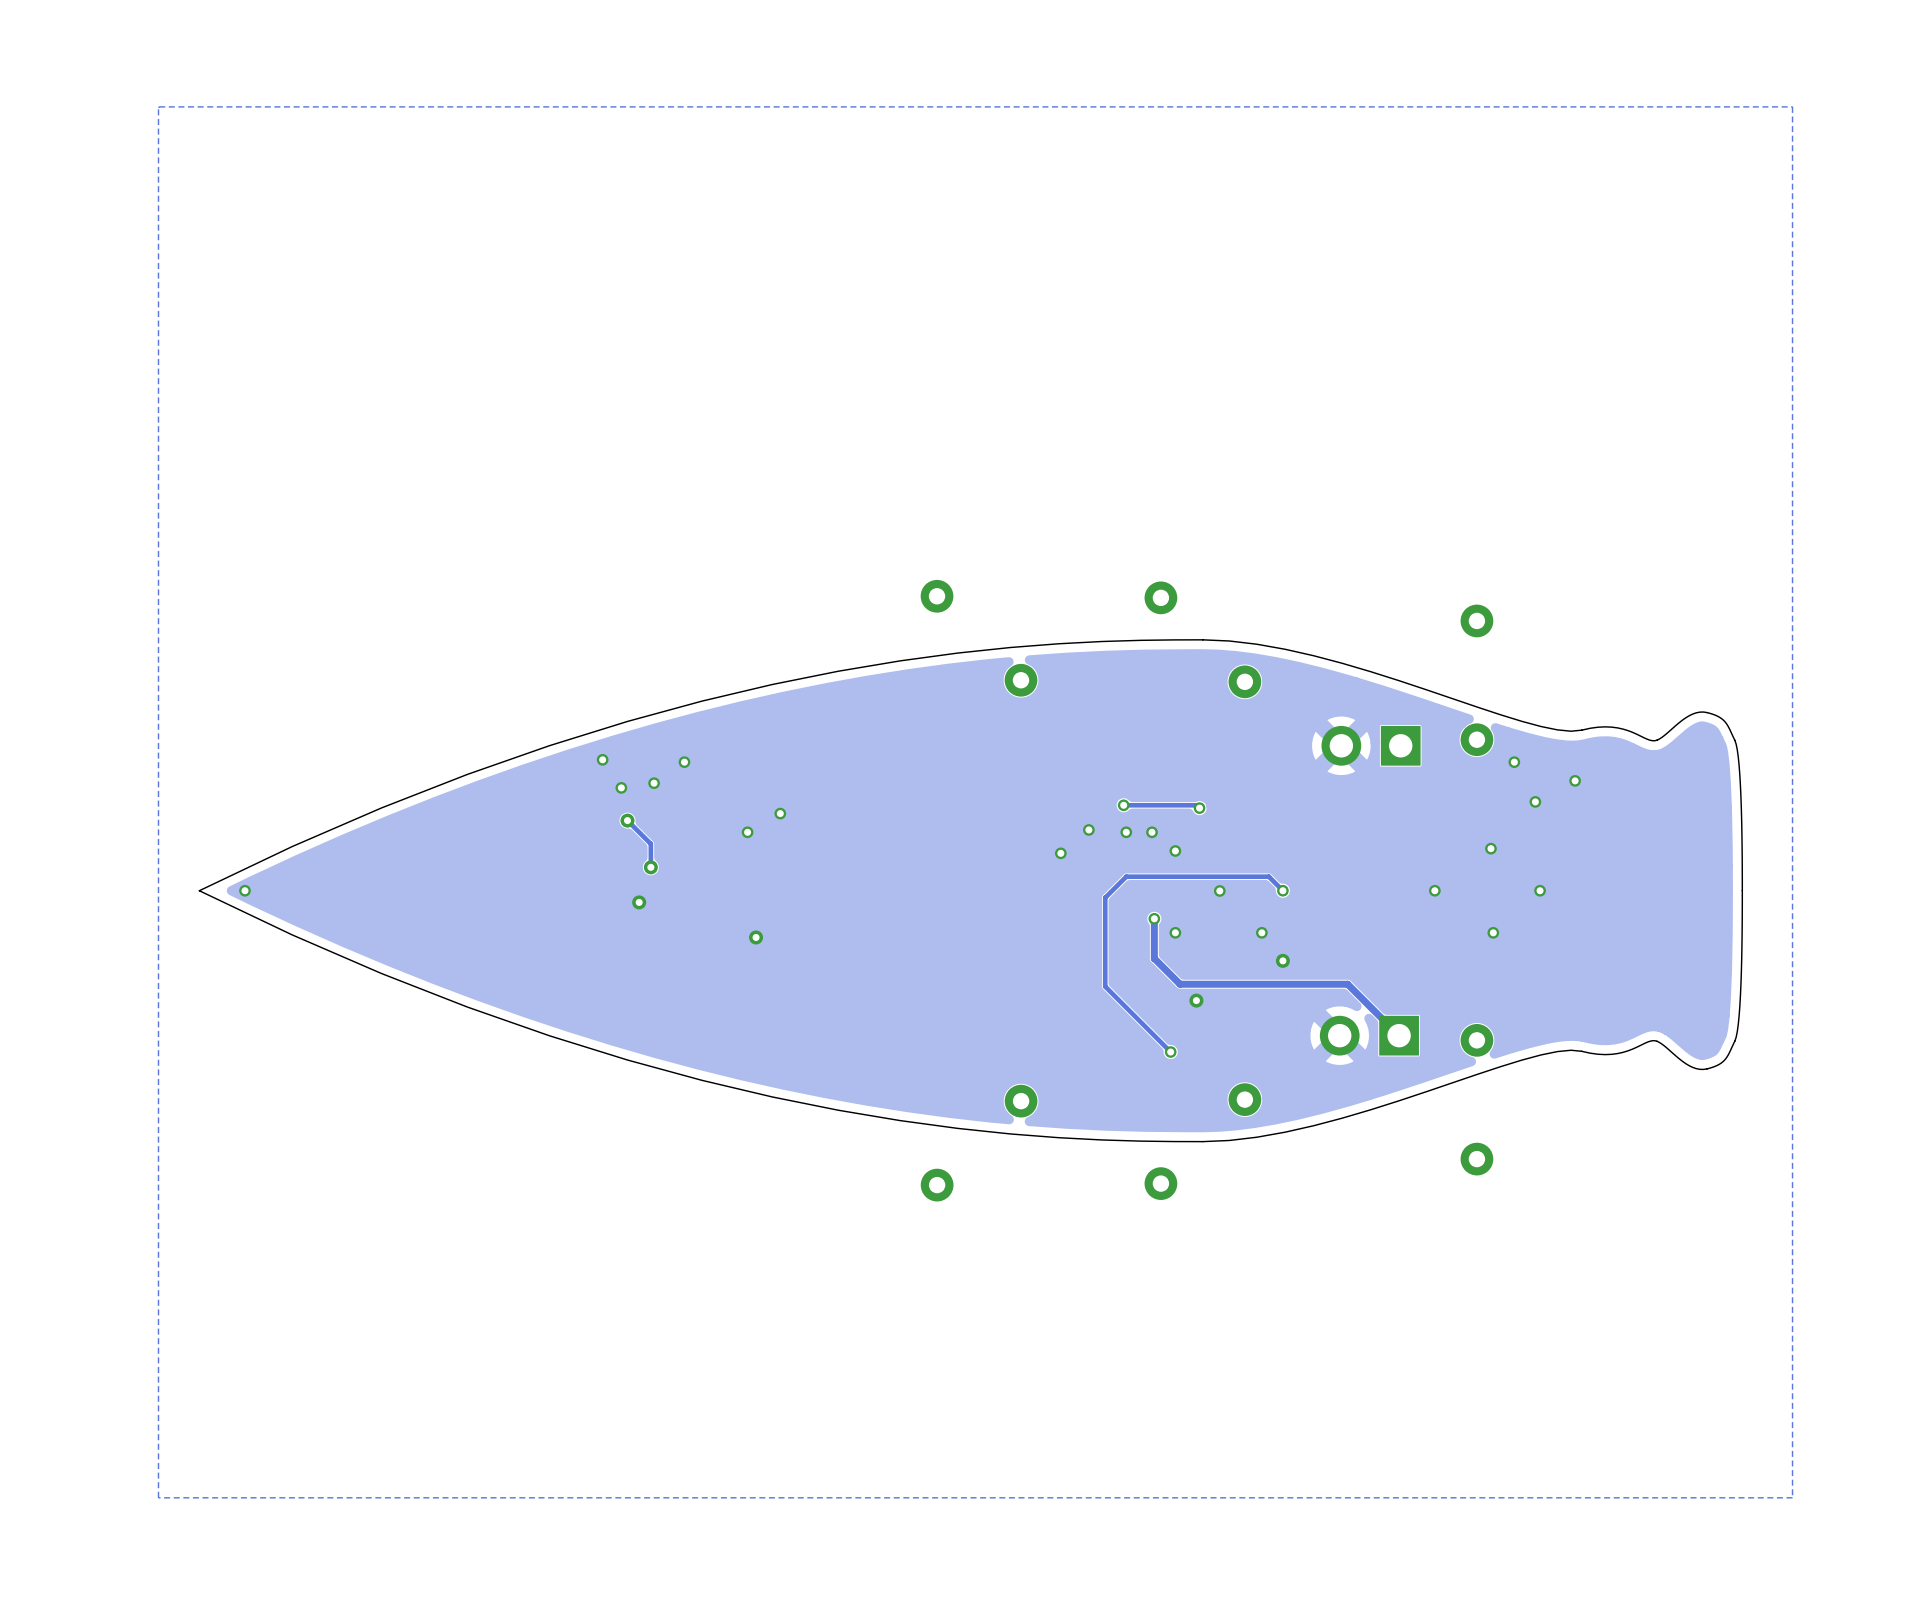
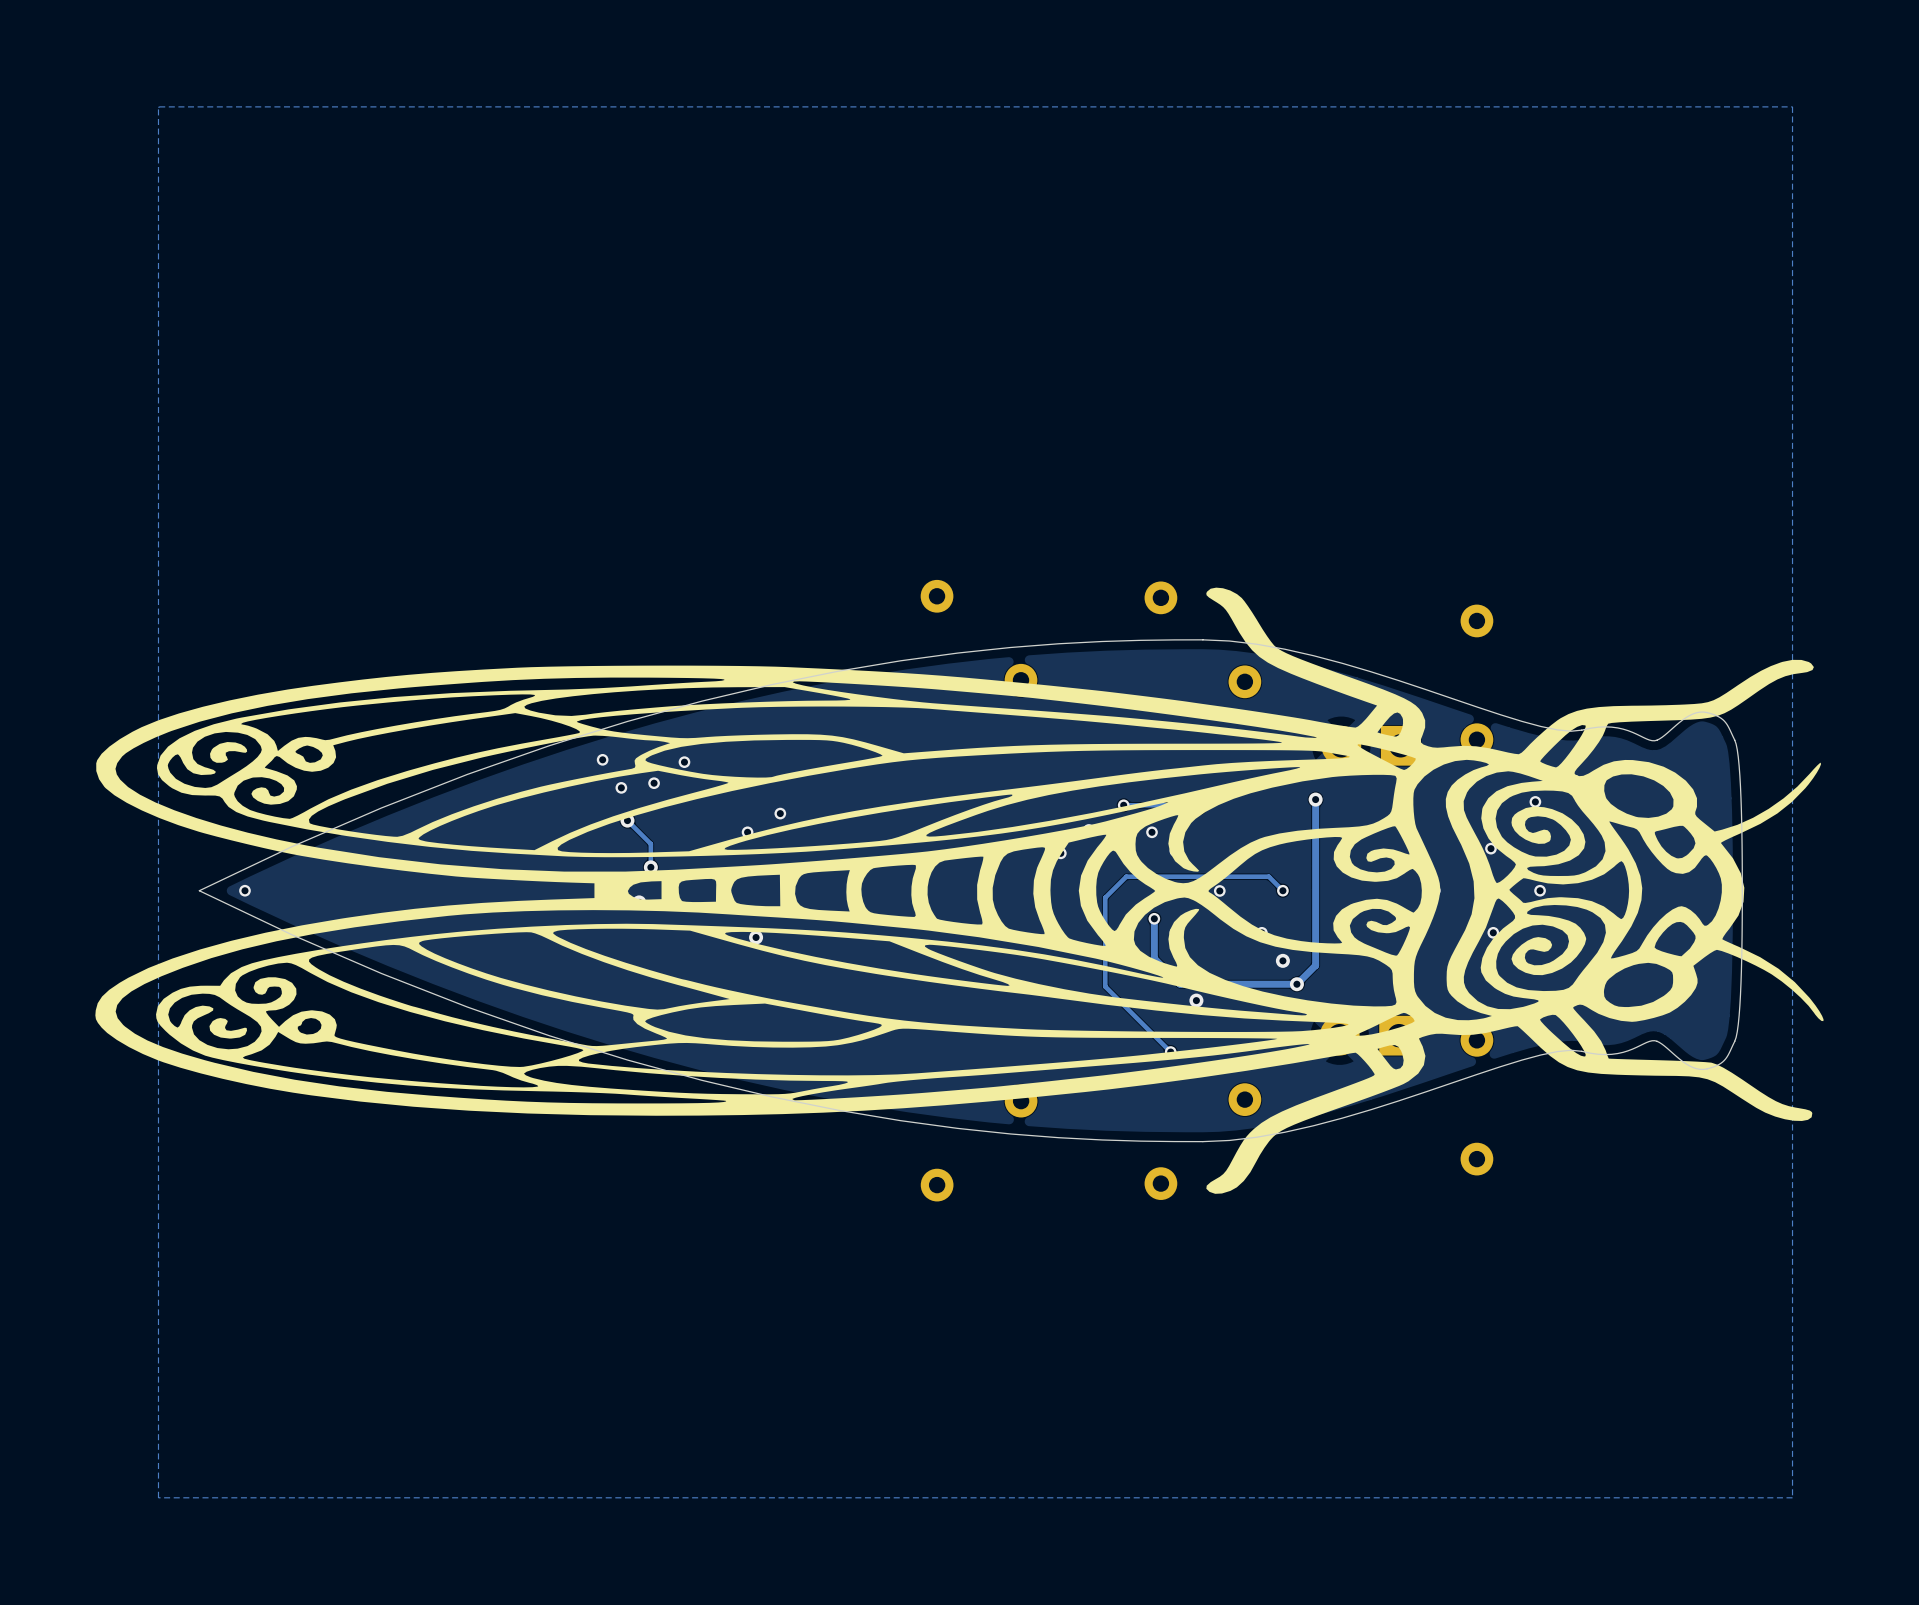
drawing: none -> [95, 587, 1824, 1194]
via: none -> (1315, 799)
track: (1296, 984) (1347, 984) (1399, 1035) -> (1296, 984) (1315, 965) (1315, 799)
via: none -> (1296, 984)

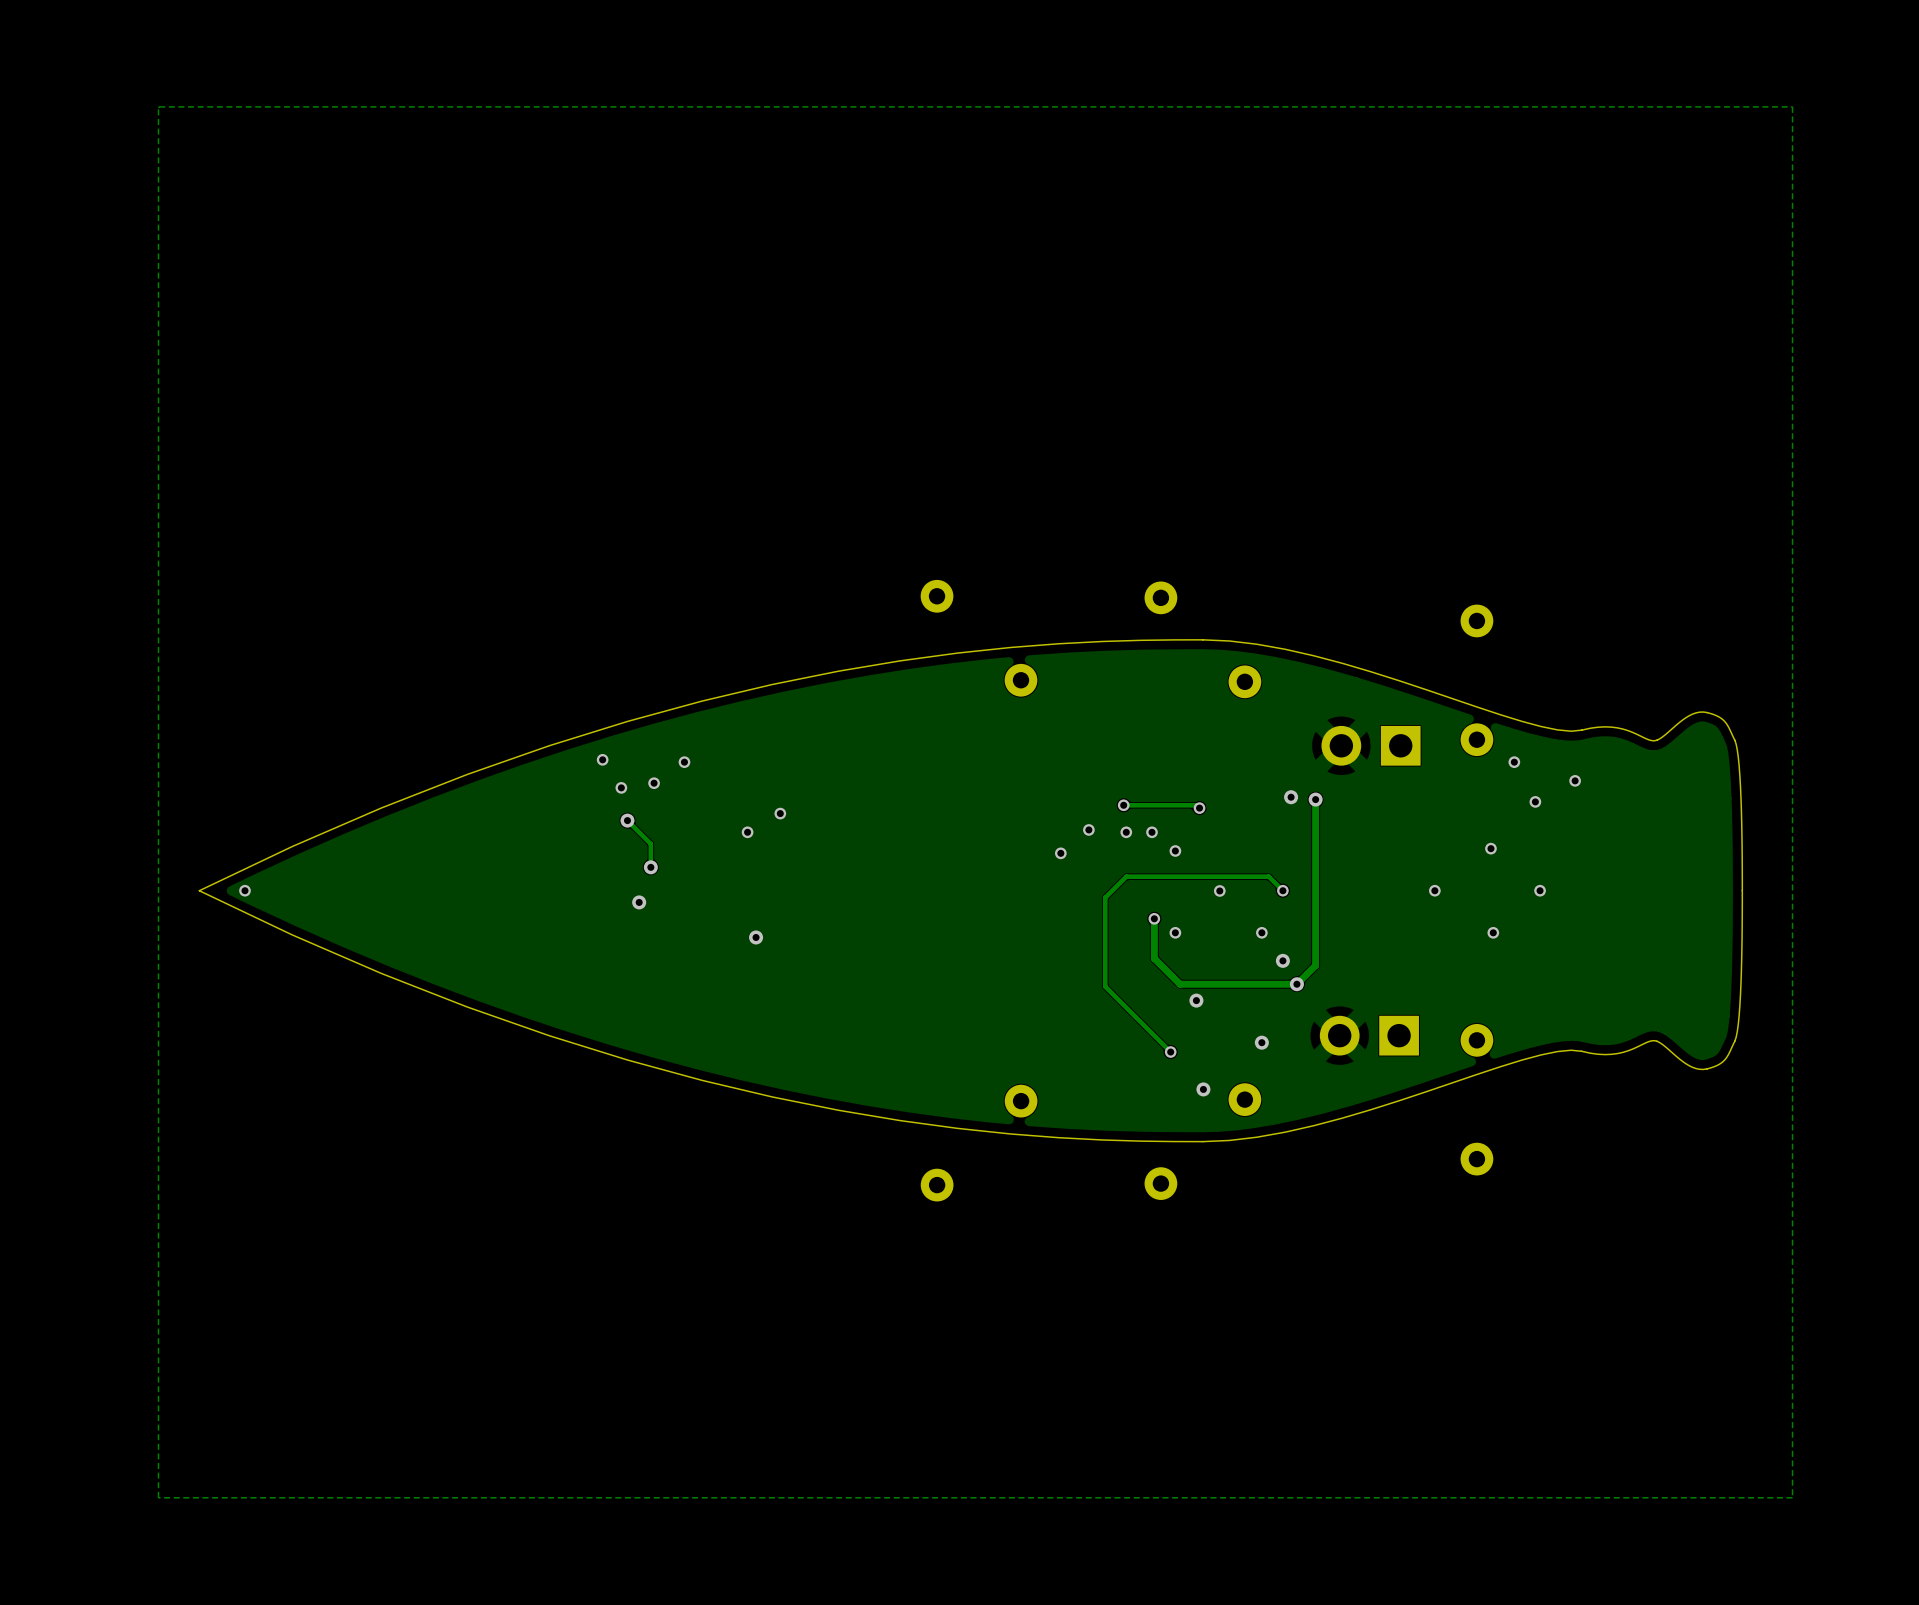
drawing: [95, 587, 1824, 1194] -> none
via: none -> (1291, 797)
via: none -> (1261, 1042)
via: none -> (1203, 1089)

